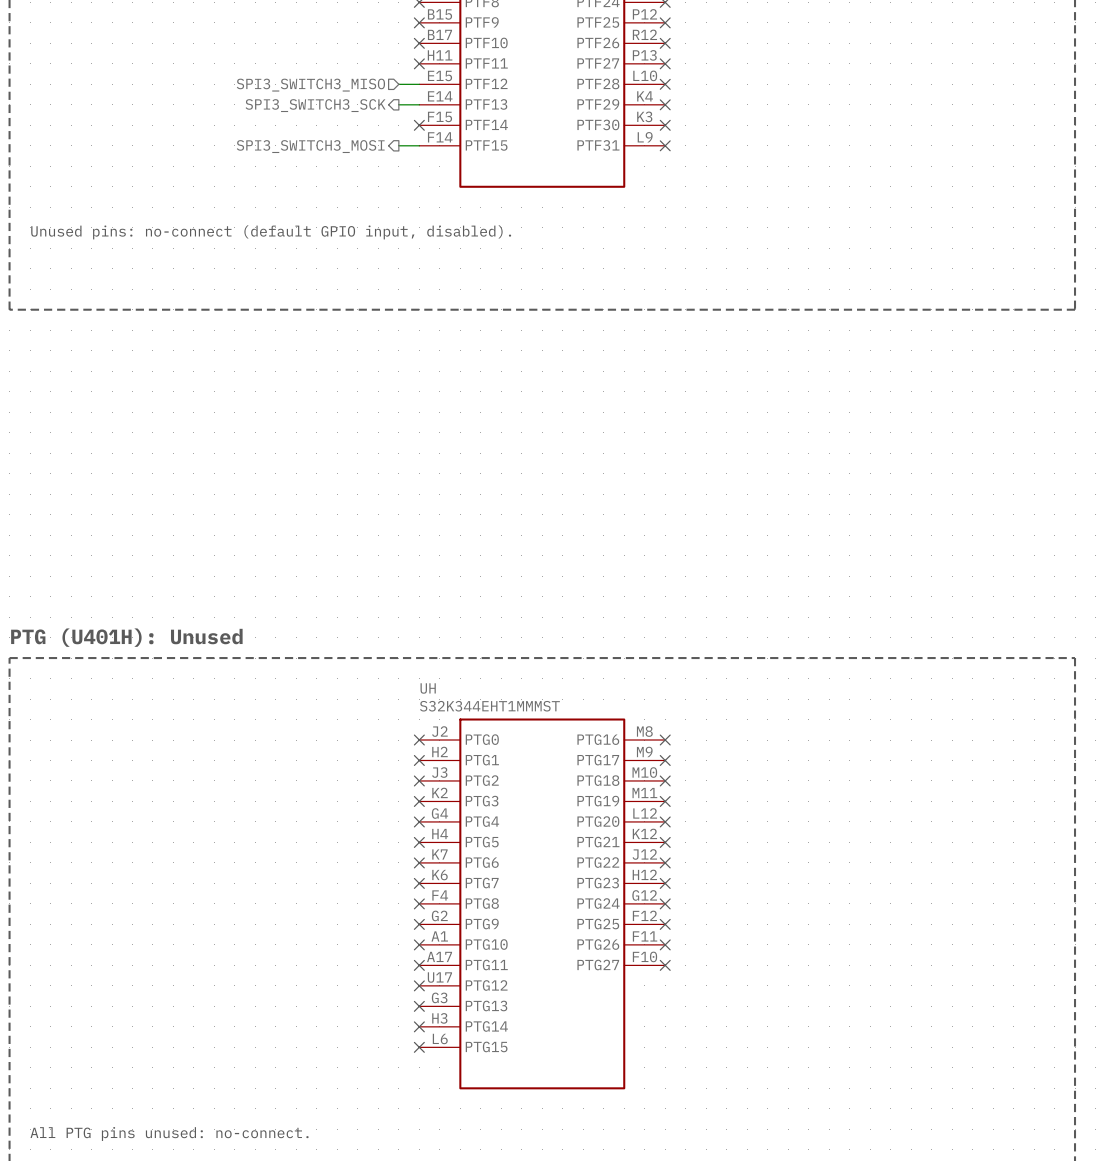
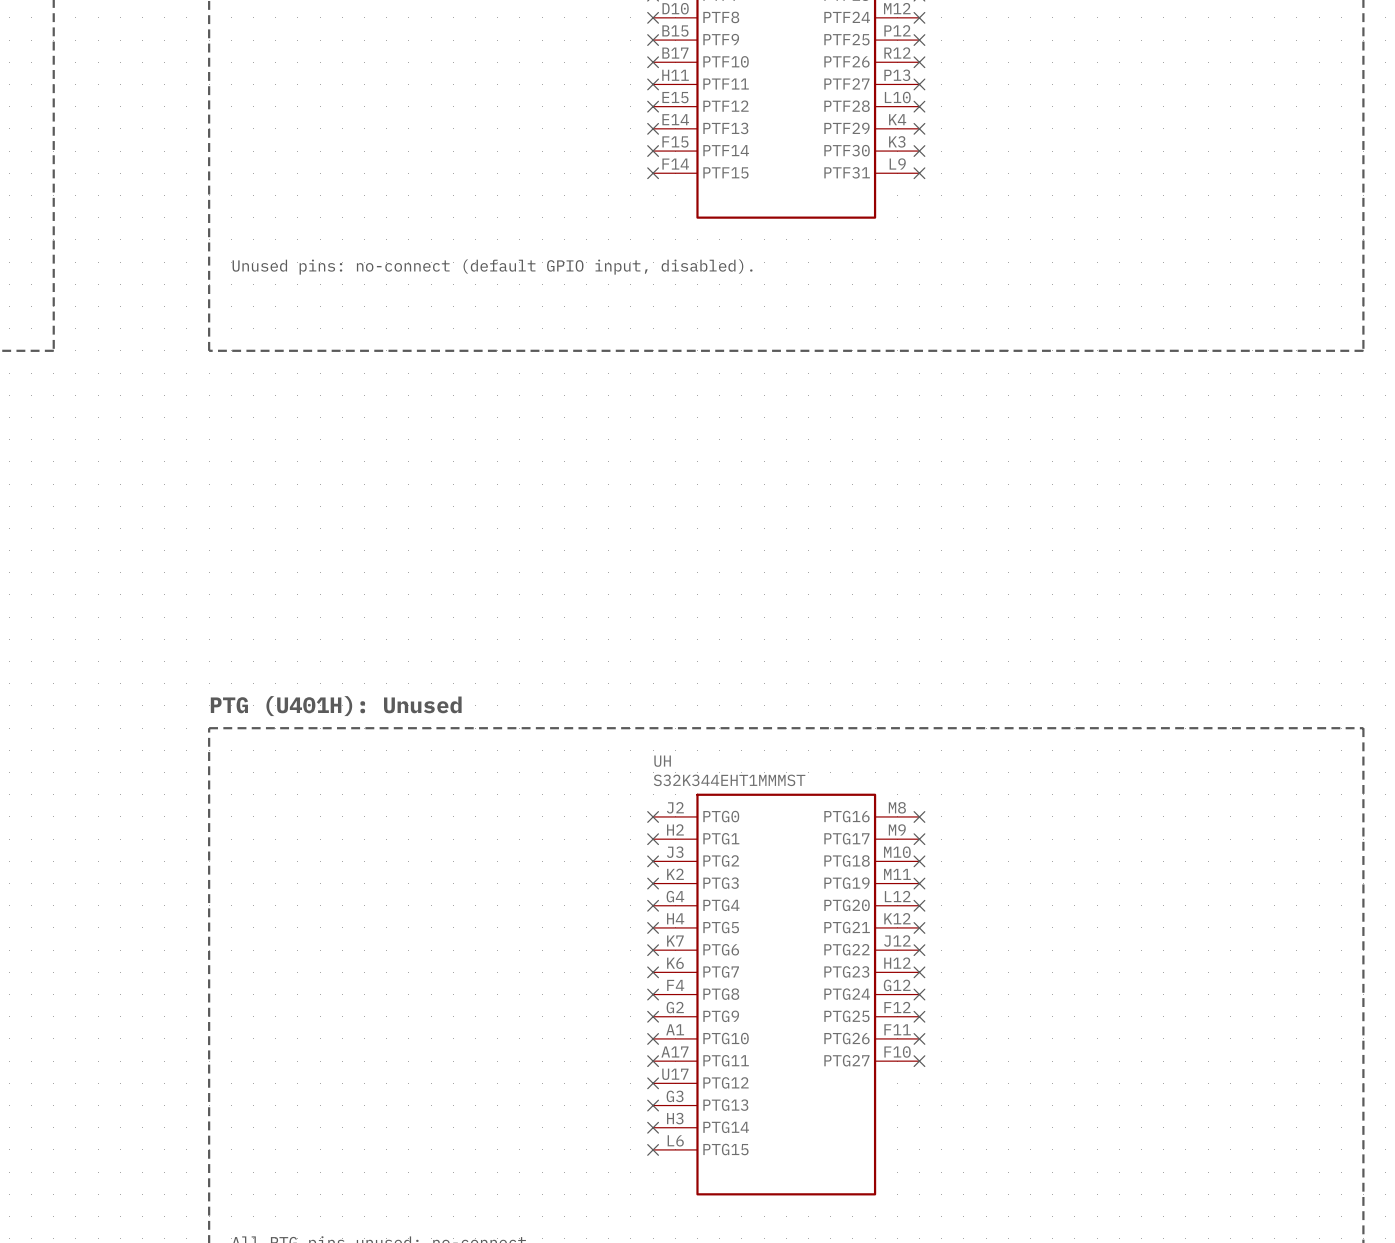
wire: (398, 84) (419, 84) -> none
no-connect mark: none -> (653, 106)
hierarchical label: SPI3_SWITCH3_MISO (310, 85) -> none
wire: (398, 104) (419, 104) -> none
no-connect mark: none -> (653, 128)
hierarchical label: SPI3_SWITCH3_SCK (315, 105) -> none
wire: (398, 145) (419, 145) -> none
no-connect mark: none -> (653, 173)
hierarchical label: SPI3_SWITCH3_MOSI (310, 146) -> none

